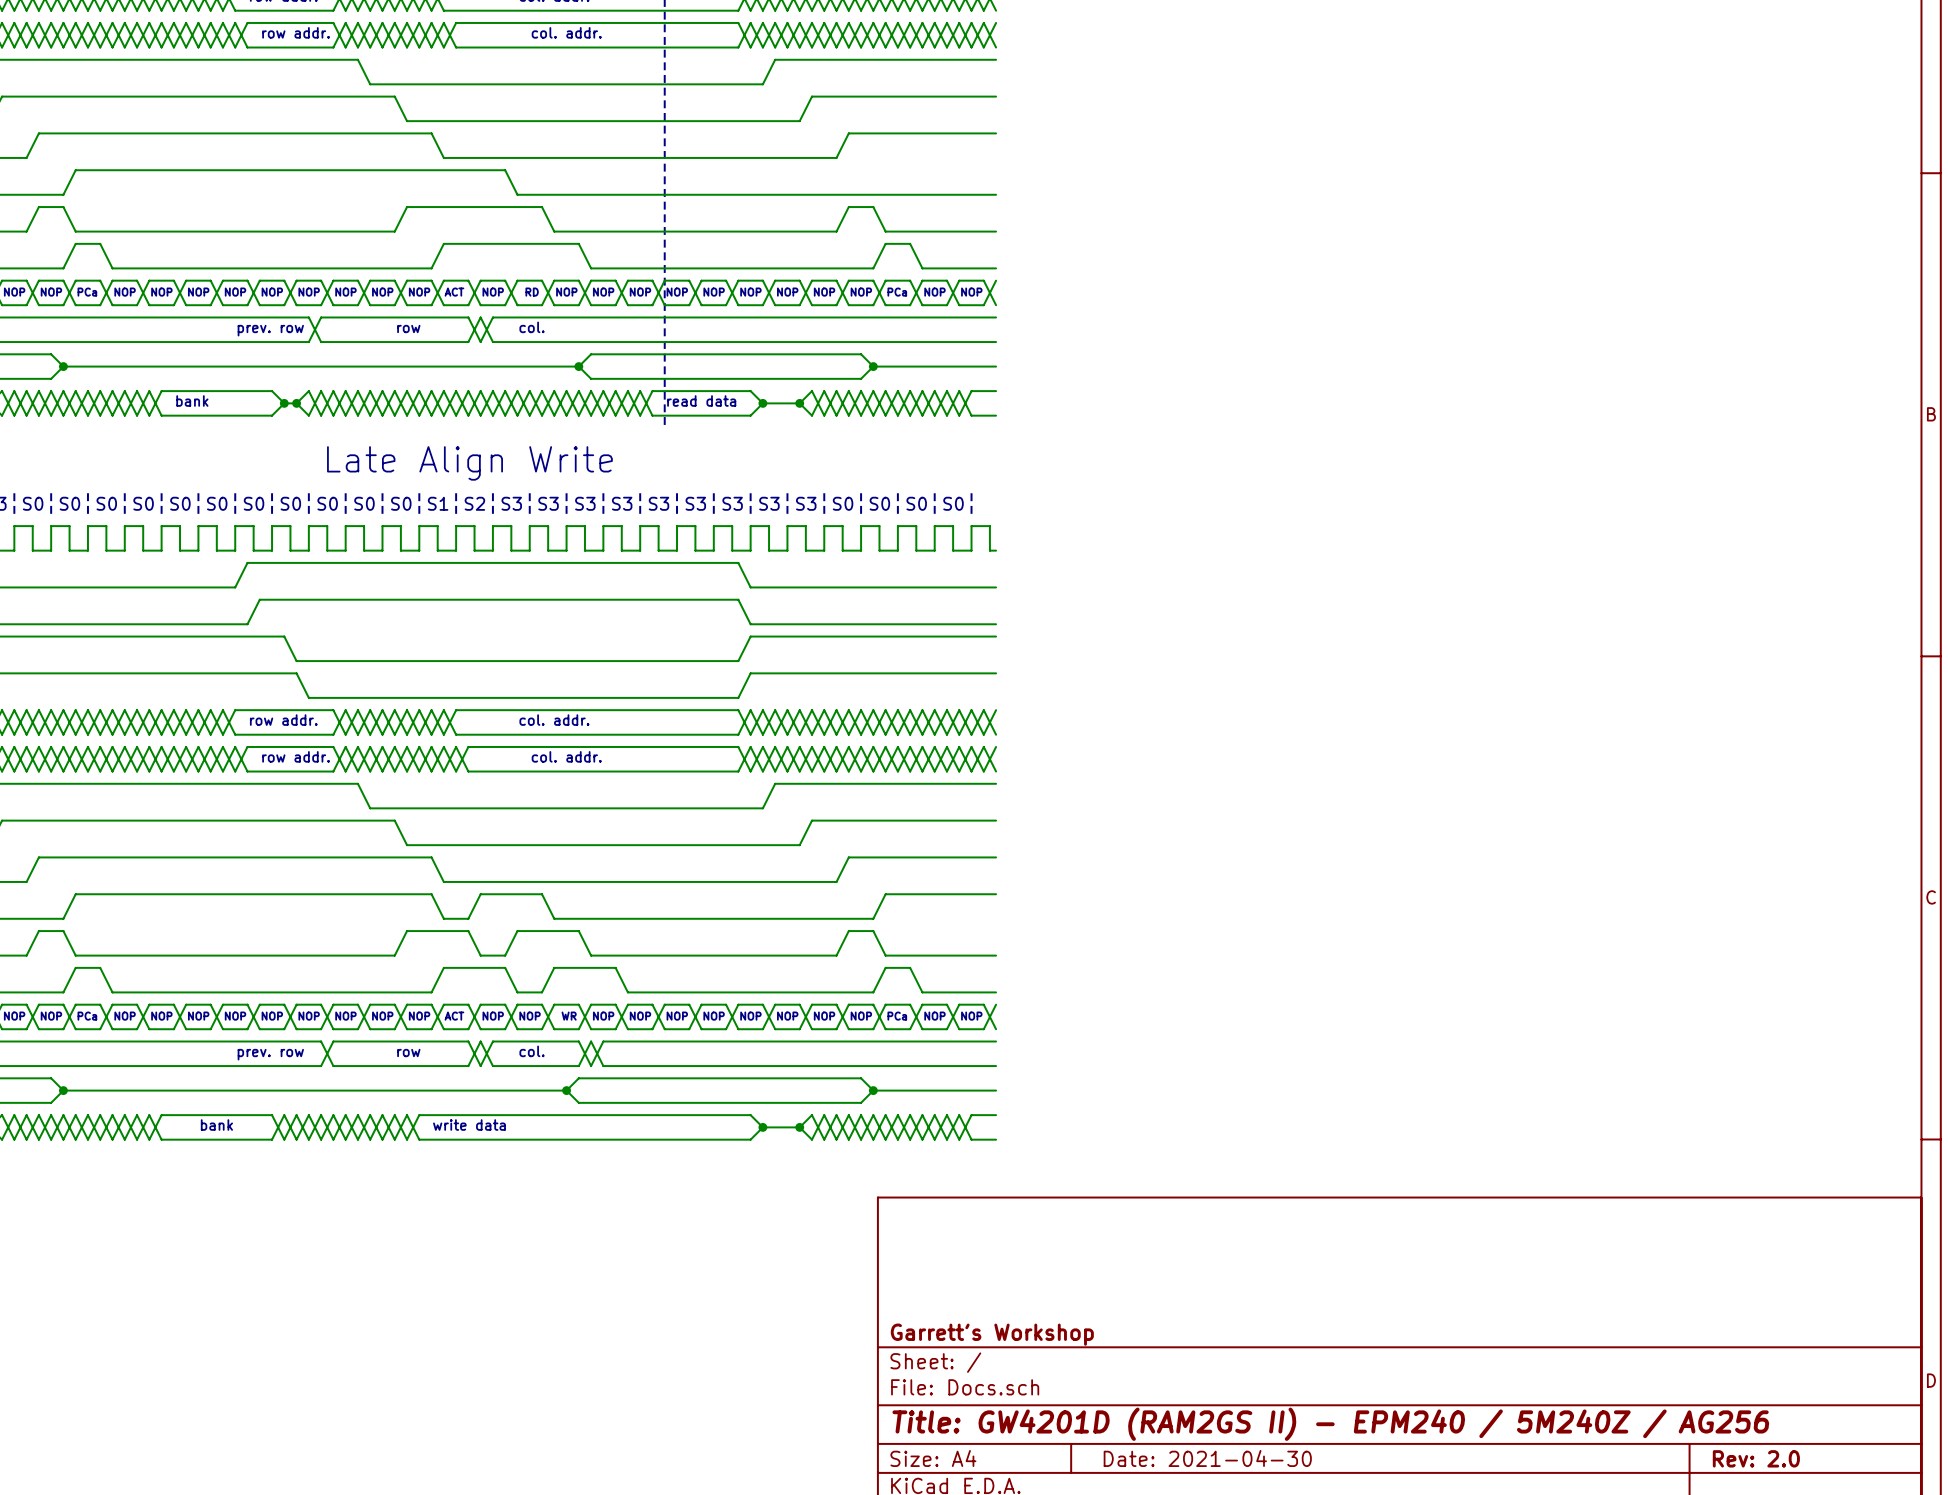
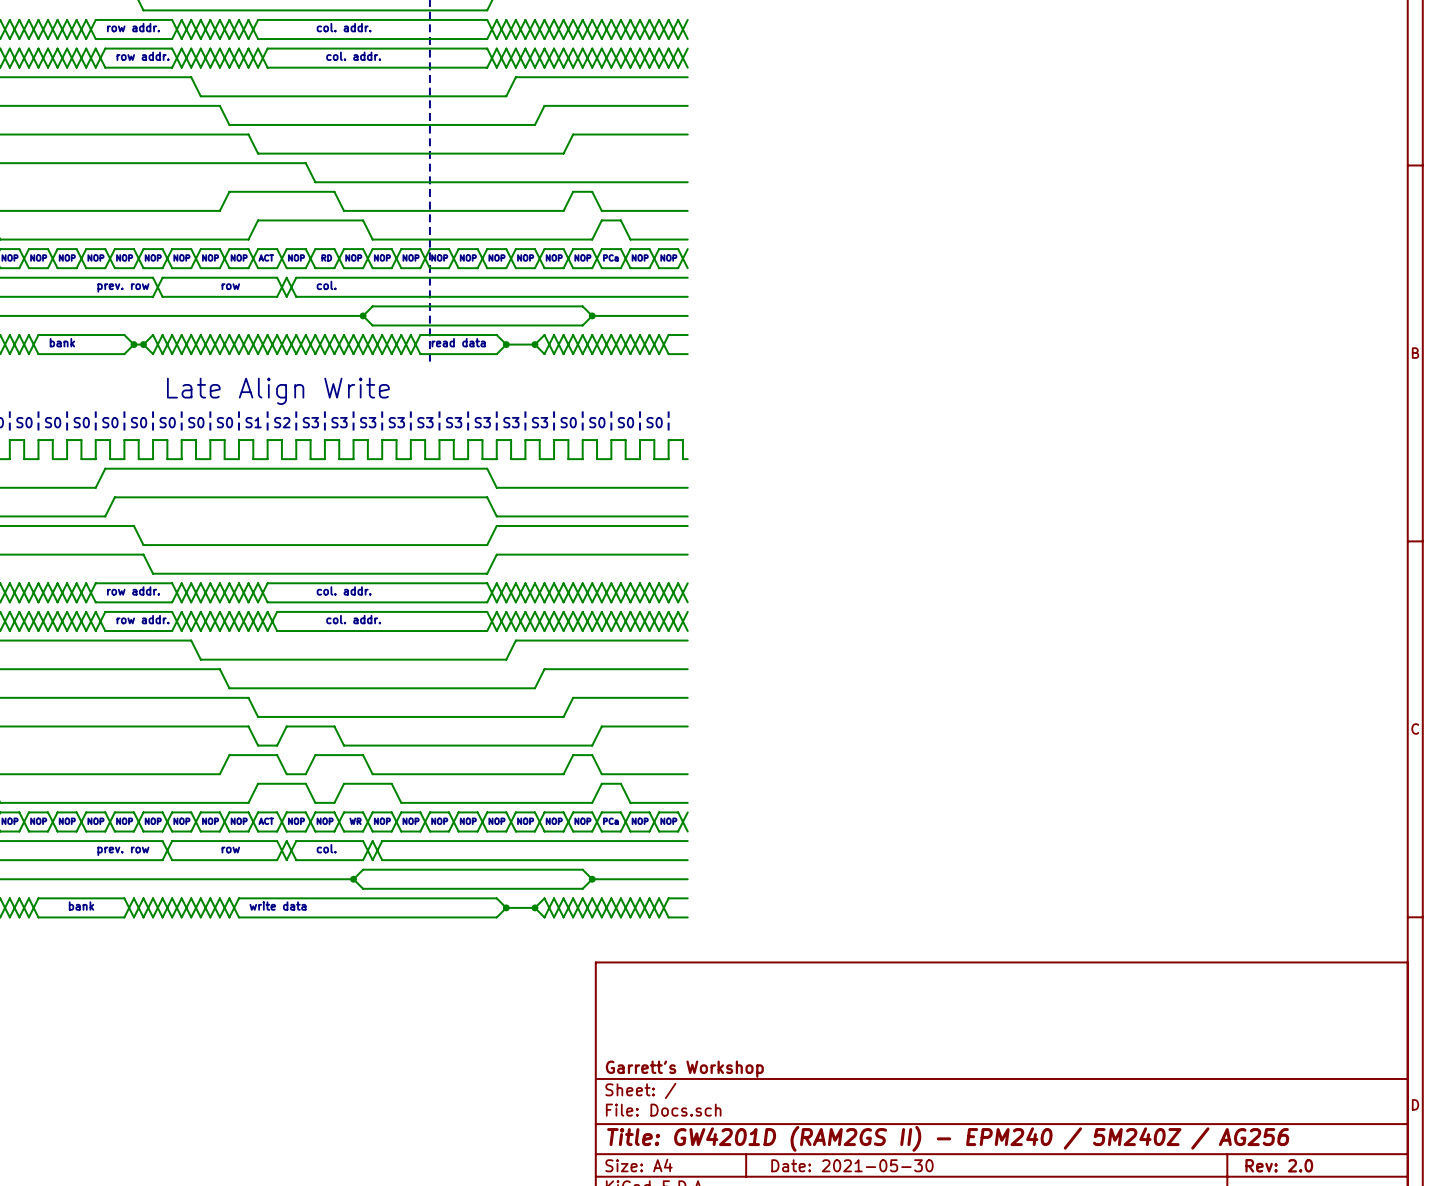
title block: Date: 2021-04-30 (1207, 1458) -> Date: 2021-05-30 (852, 1165)

